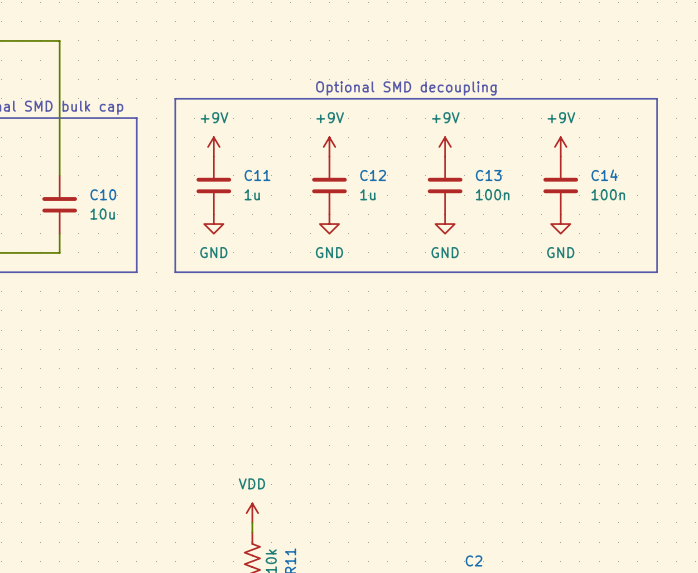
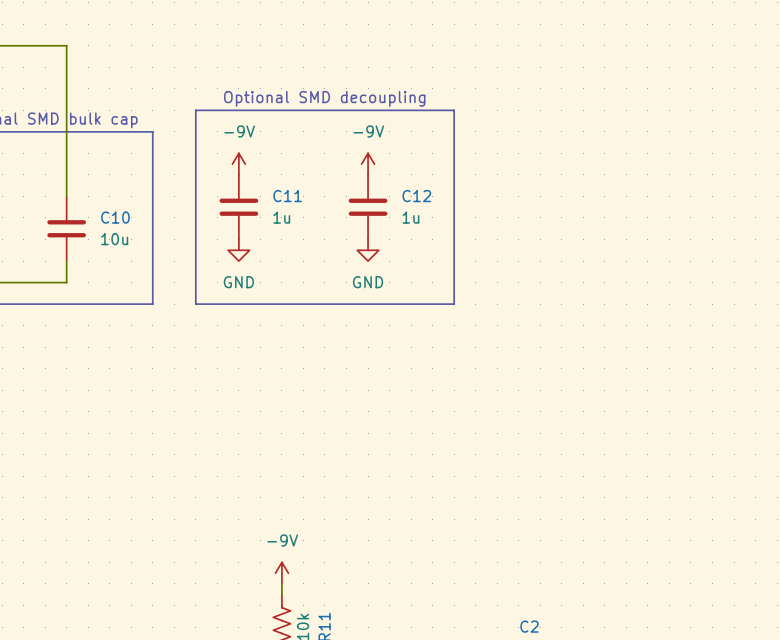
text position: Optional SMD decoupling (406, 88) -> Optional SMD decoupling (324, 98)
line: (406, 98) (657, 98) (657, 272) (406, 272) -> (454, 110) (454, 304)
power symbol: +9V (213, 146) -> -9V (238, 164)
power symbol: +9V (329, 146) -> -9V (368, 164)
power symbol: +9V (445, 146) -> none
power symbol: +9V (560, 146) -> none
C13: 100n (445, 185) -> none
C14: 100n (560, 185) -> none
power symbol: GND (445, 224) -> none
power symbol: GND (560, 224) -> none
power symbol: VDD (252, 513) -> -9V (281, 573)

